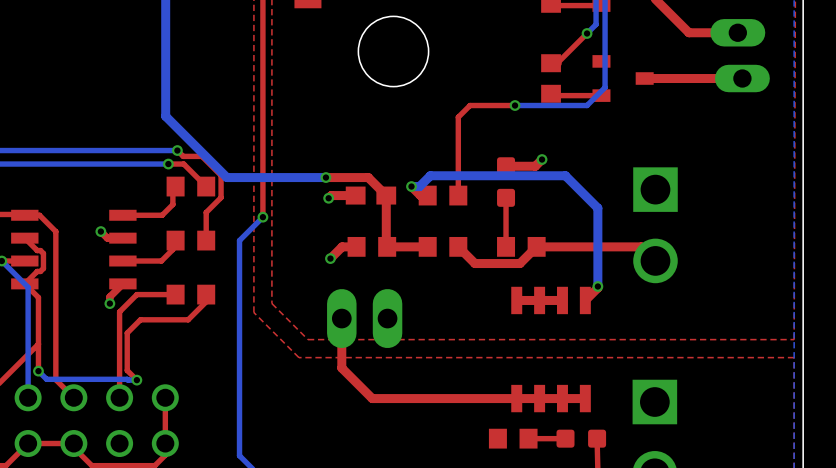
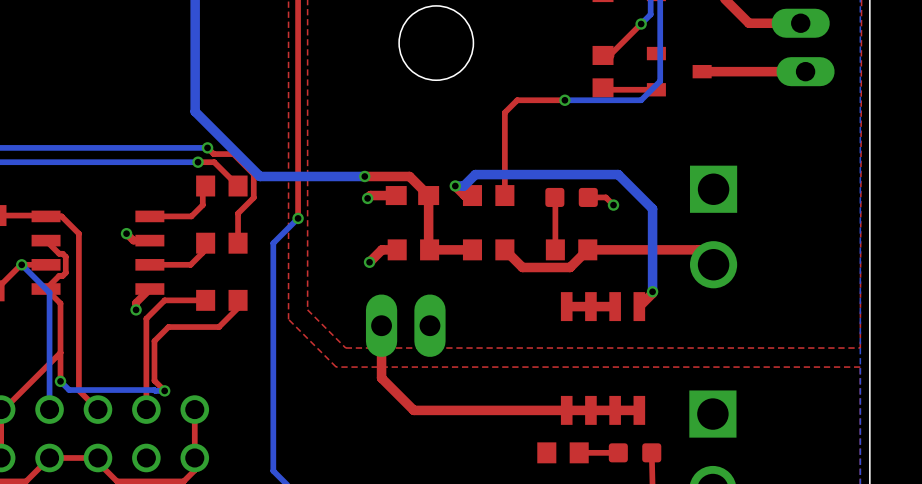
top track: (542, 159) (535, 166) (506, 166) -> none
via position: (542, 159) -> (613, 205)
part rotation: 0° (506, 182) -> 90° clockwise (571, 197)
top track: none -> (588, 197) (605, 197) (613, 205)

